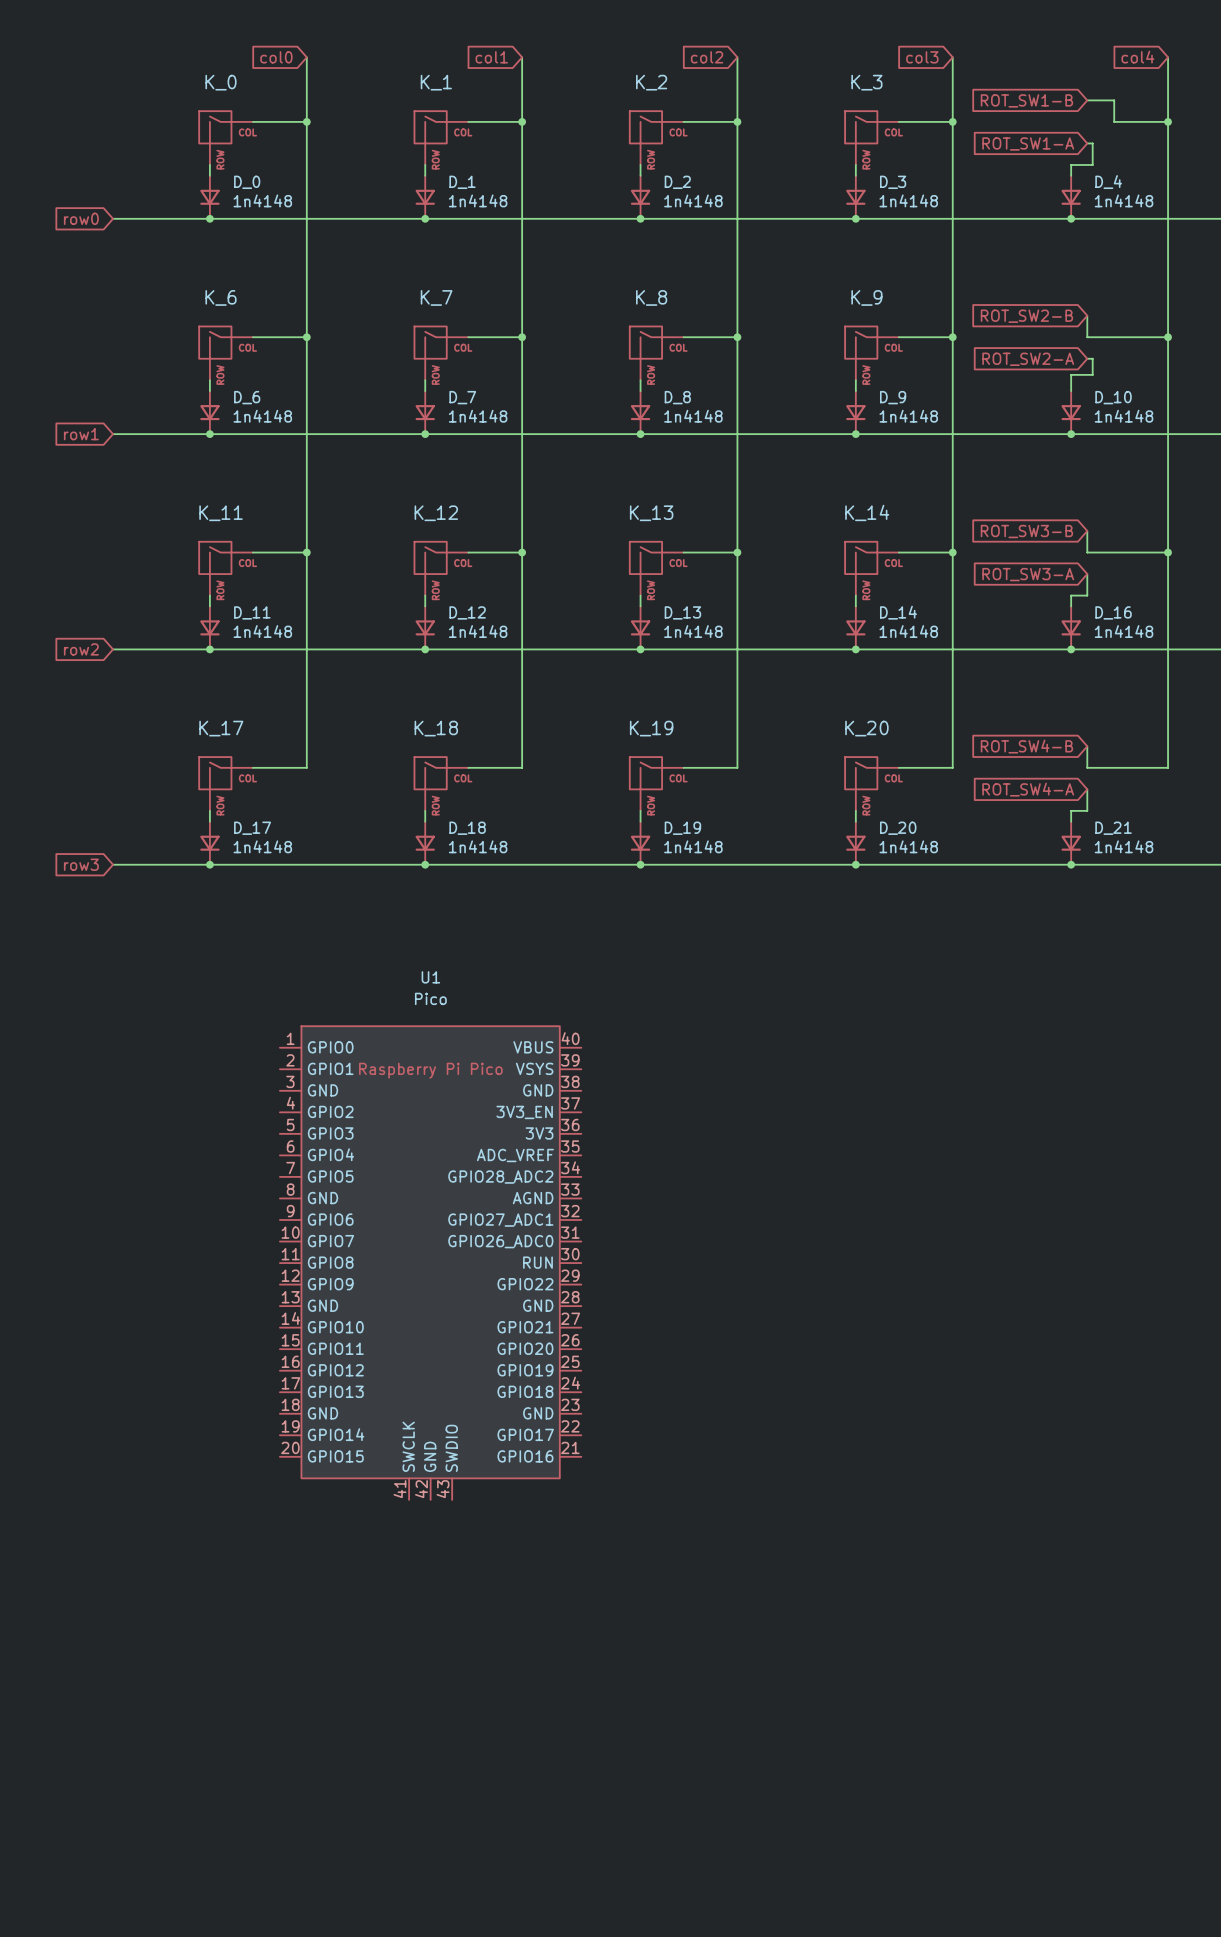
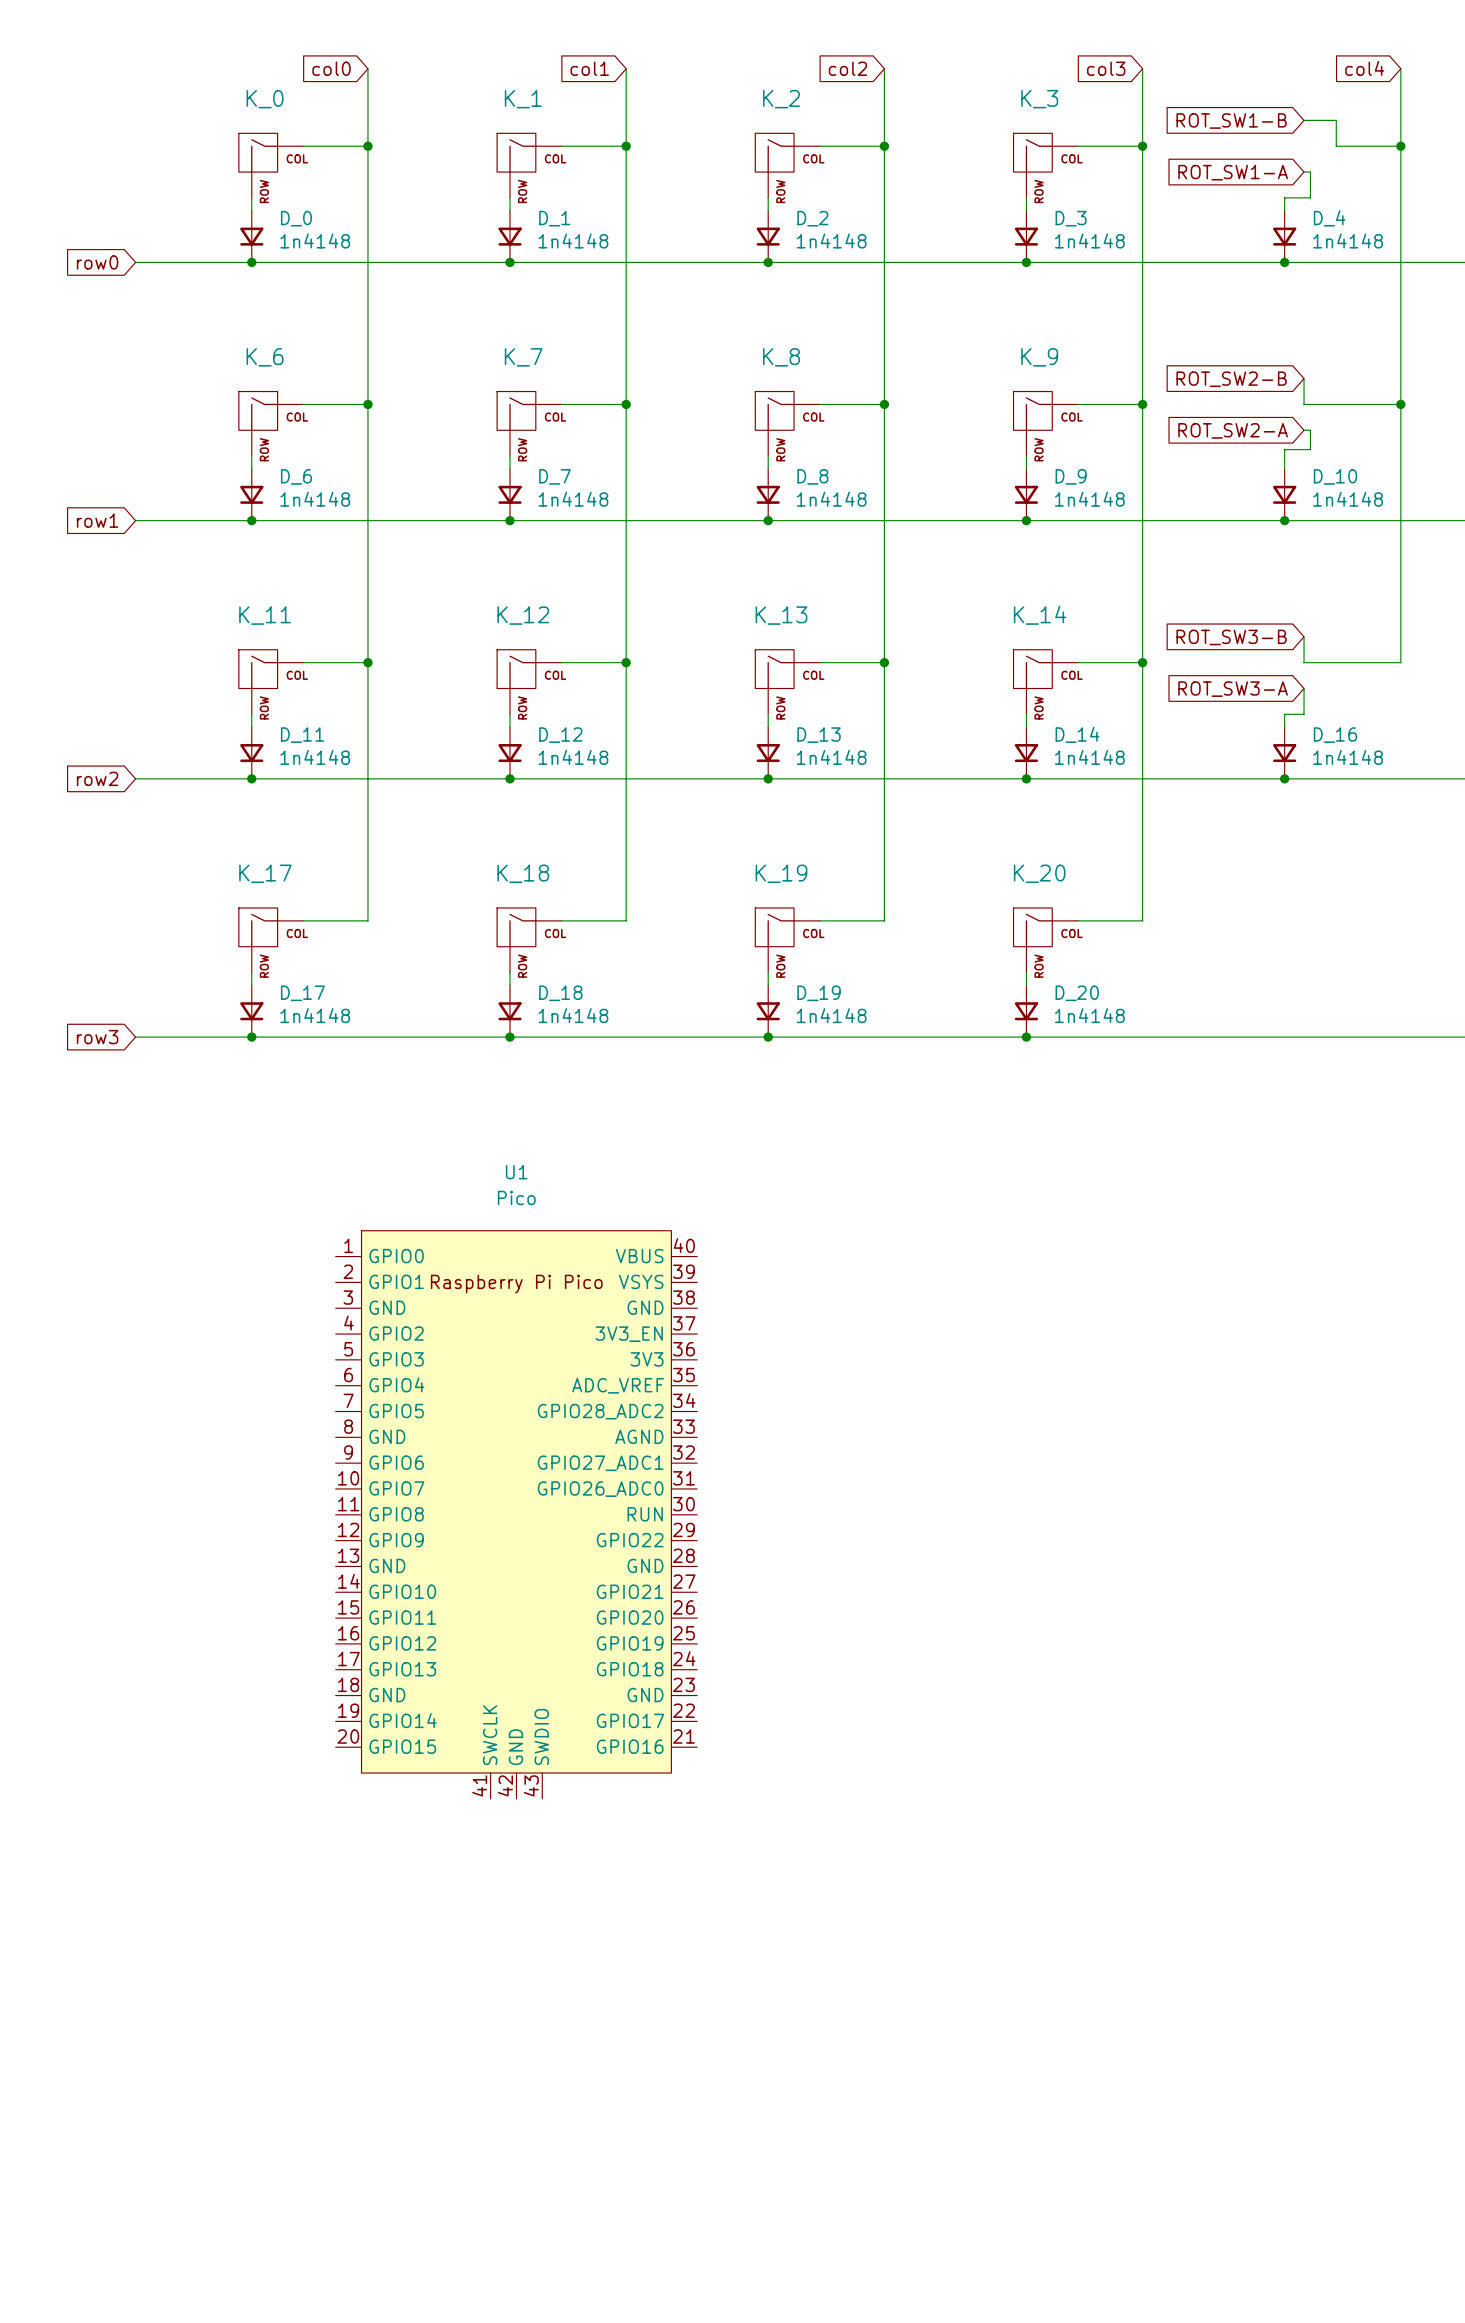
wire: (1168, 552) (1168, 767) (1087, 767) (1087, 746) -> none
junction: (1168, 552) -> none
global label: ROT_SW4-B (1026, 746) -> none
global label: ROT_SW4-A (1028, 789) -> none
wire: (1087, 789) (1087, 810) (1071, 810) (1071, 821) -> none
D_21: 1n4148 (1071, 843) -> none
junction: (1071, 864) -> none

